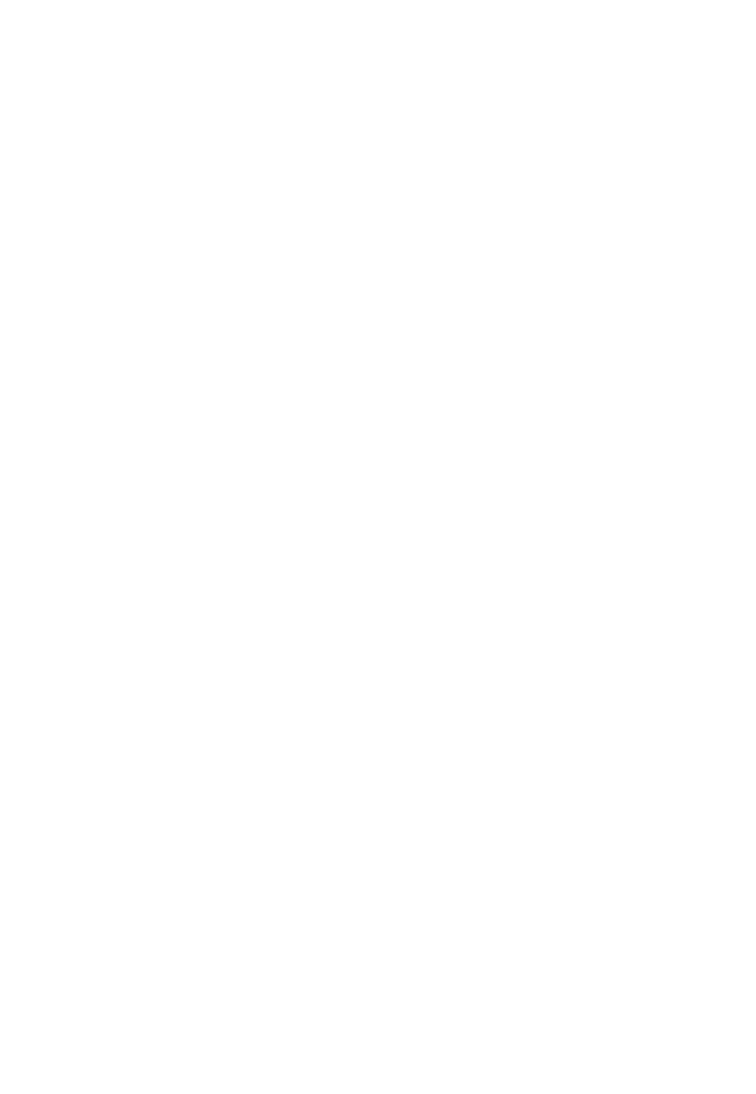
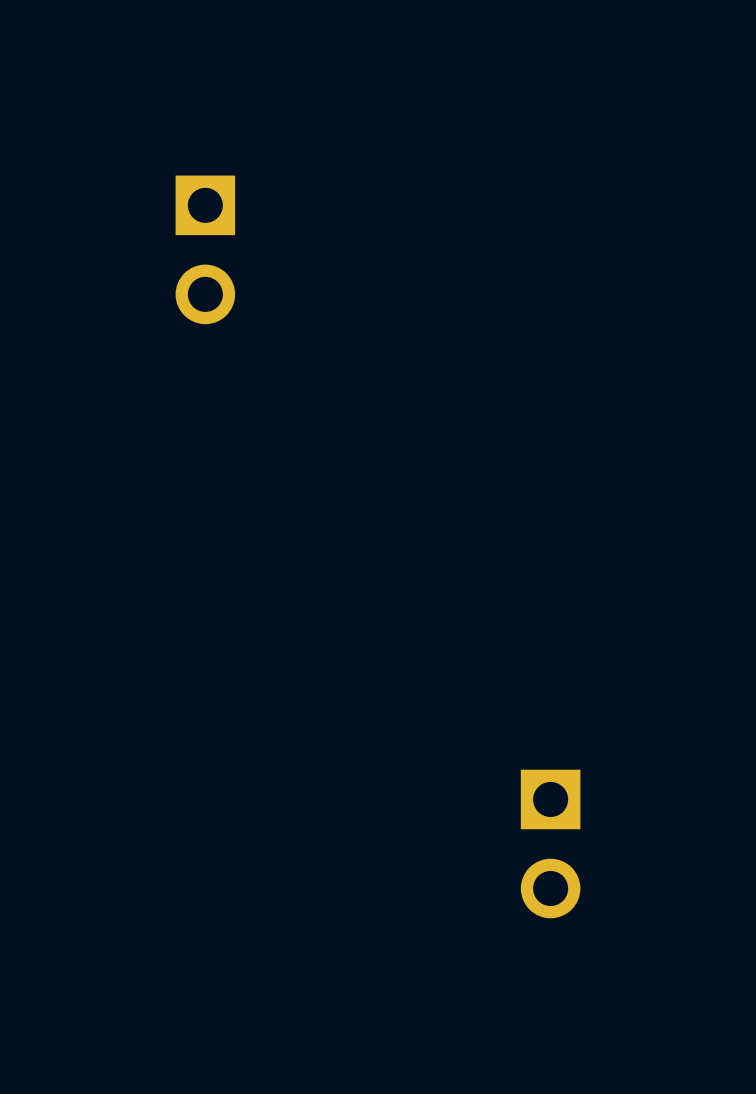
part: none -> (205, 249)
part: none -> (550, 843)

